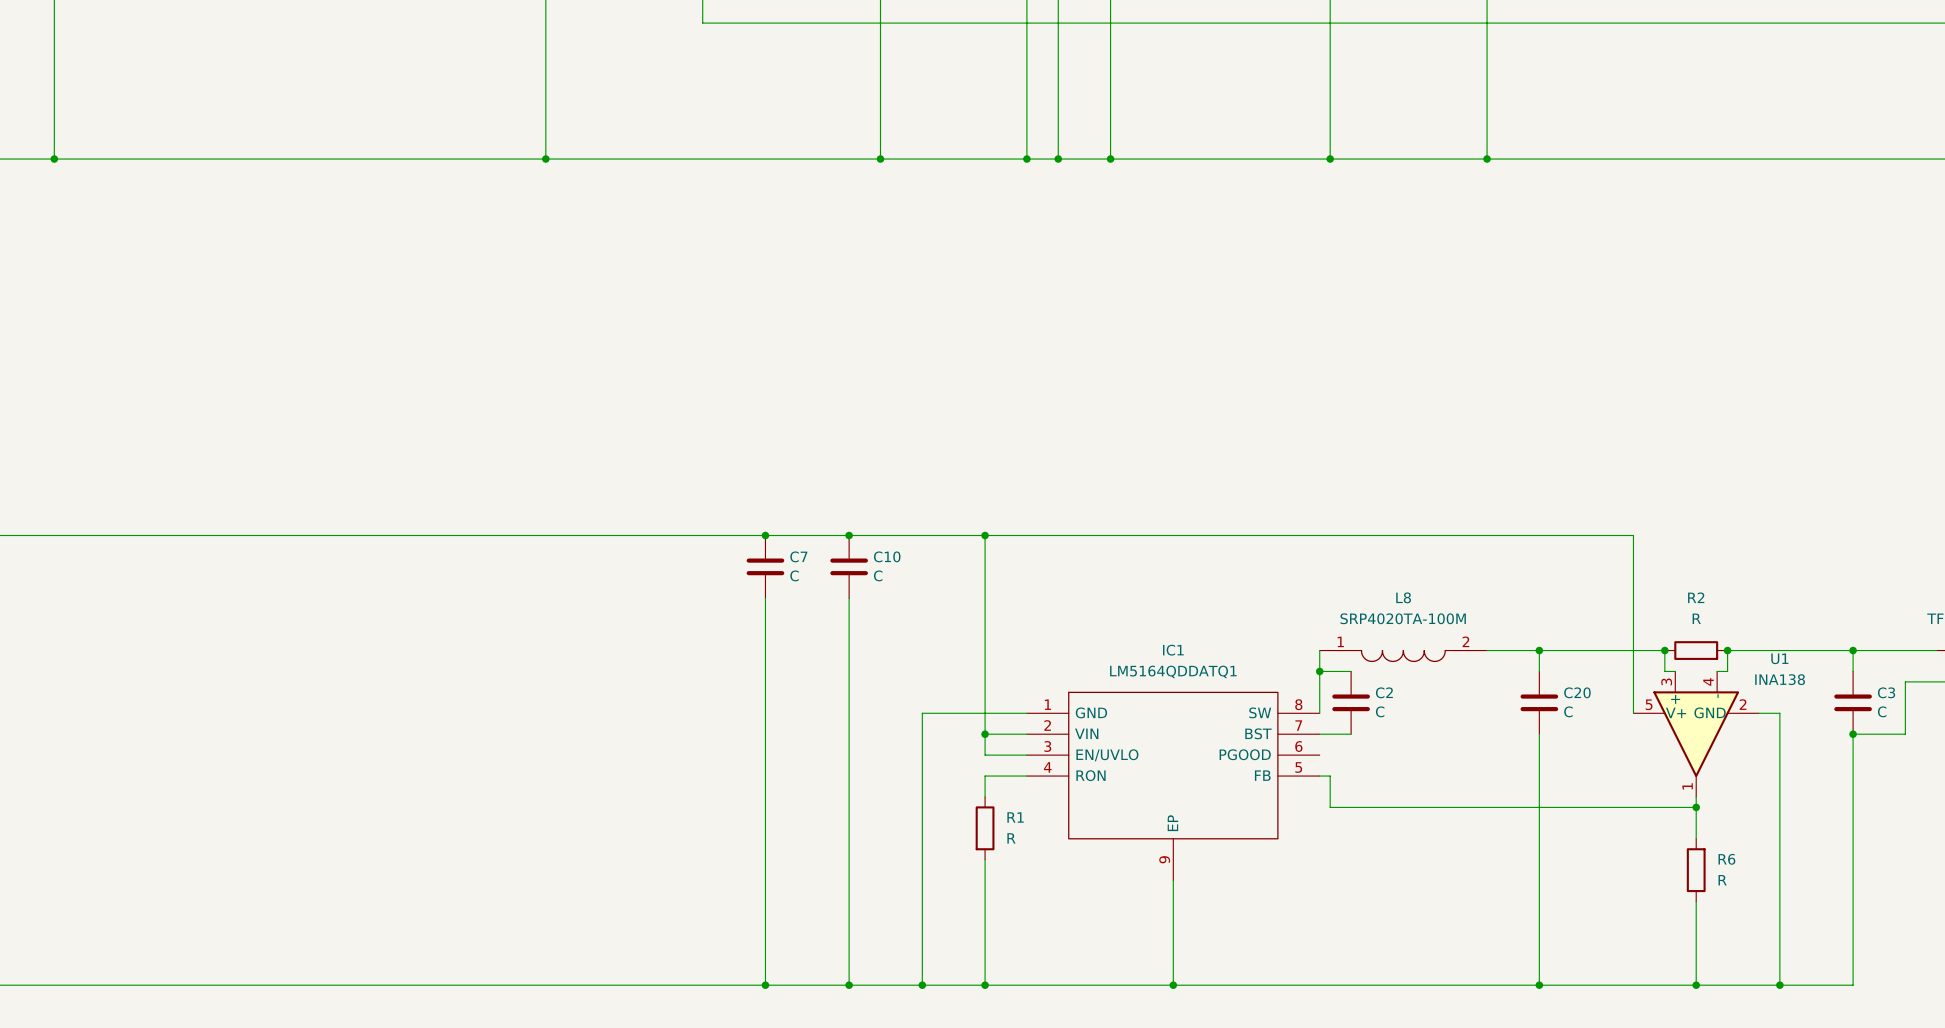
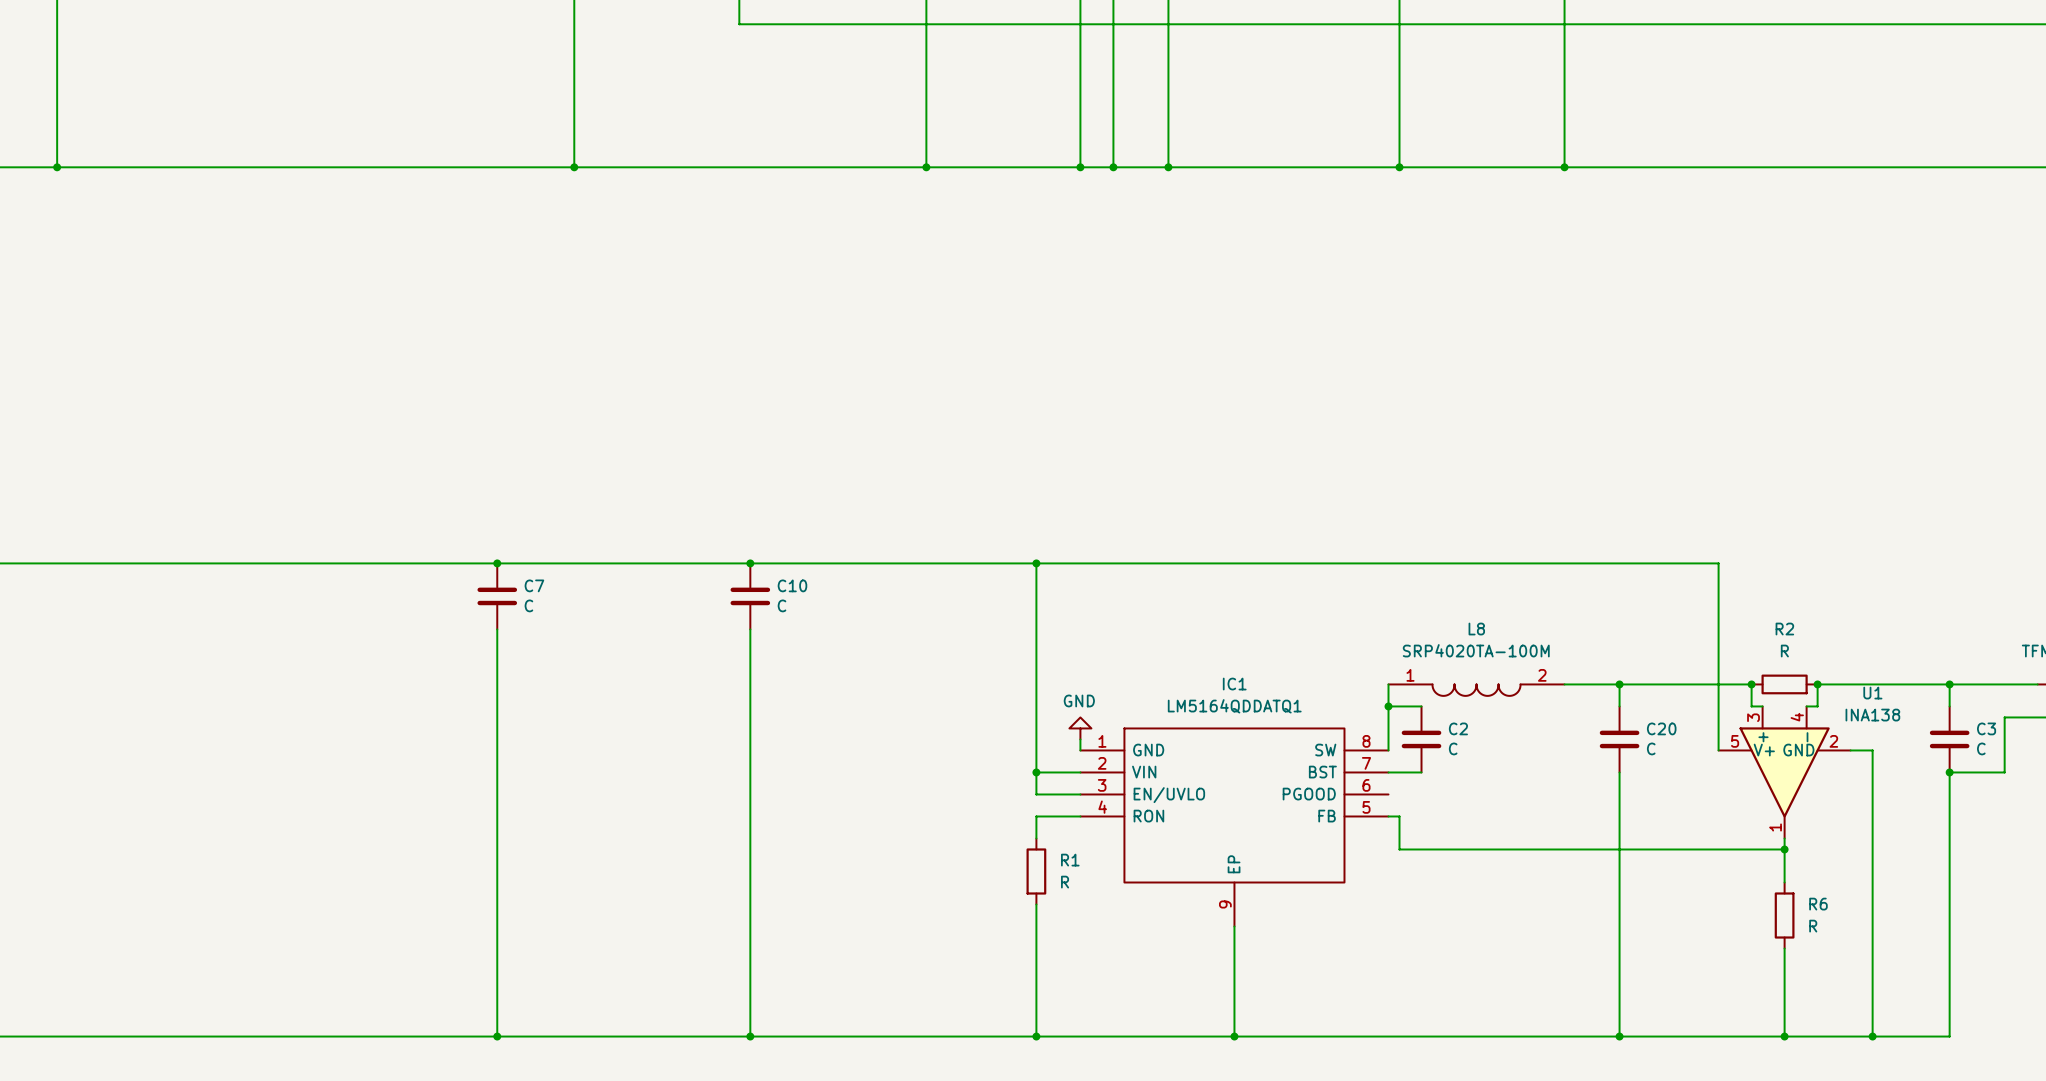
junction: none -> (497, 563)
junction: none -> (750, 563)
junction: (765, 535) -> none
junction: (849, 535) -> none
C7 position: (765, 566) -> (497, 596)
C10 position: (849, 566) -> (750, 596)
wire: none -> (497, 629) (497, 1036)
wire: (765, 598) (765, 985) -> (750, 629) (750, 1036)
wire: (849, 598) (849, 985) -> none
power symbol: none -> GND (1080, 728)
wire: (1026, 713) (922, 713) (922, 985) -> (1080, 750) (1080, 739)
junction: none -> (497, 1036)
junction: none -> (750, 1036)
junction: (765, 985) -> none
junction: (849, 985) -> none
junction: (922, 985) -> none

